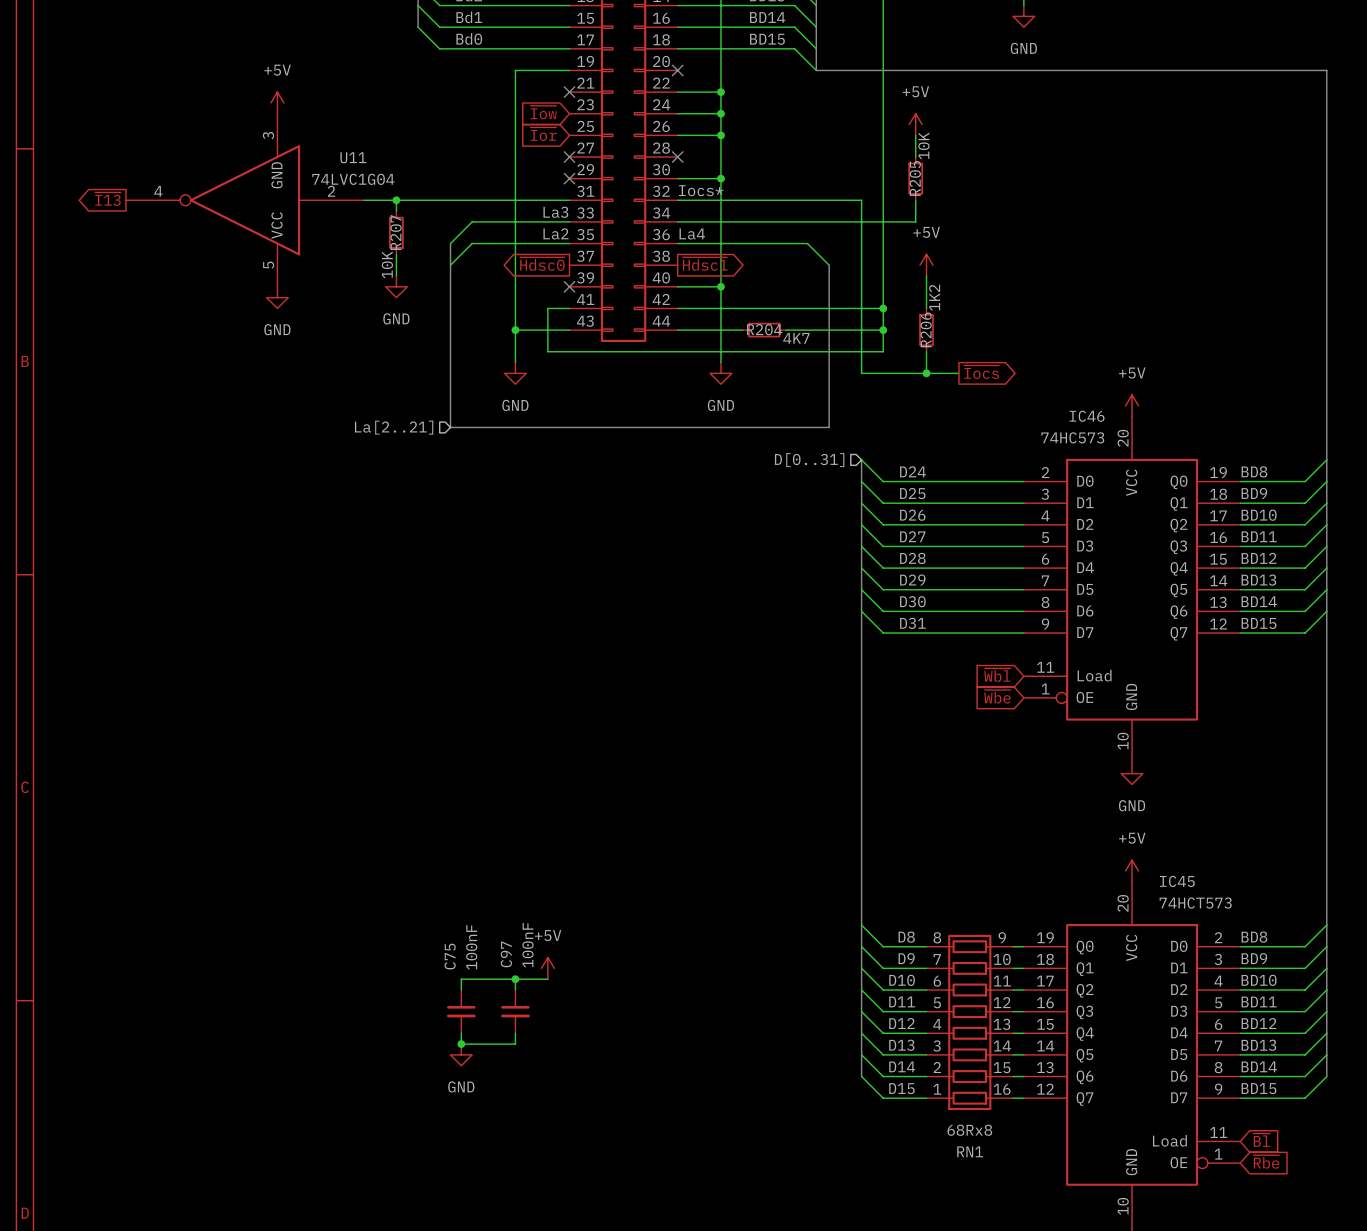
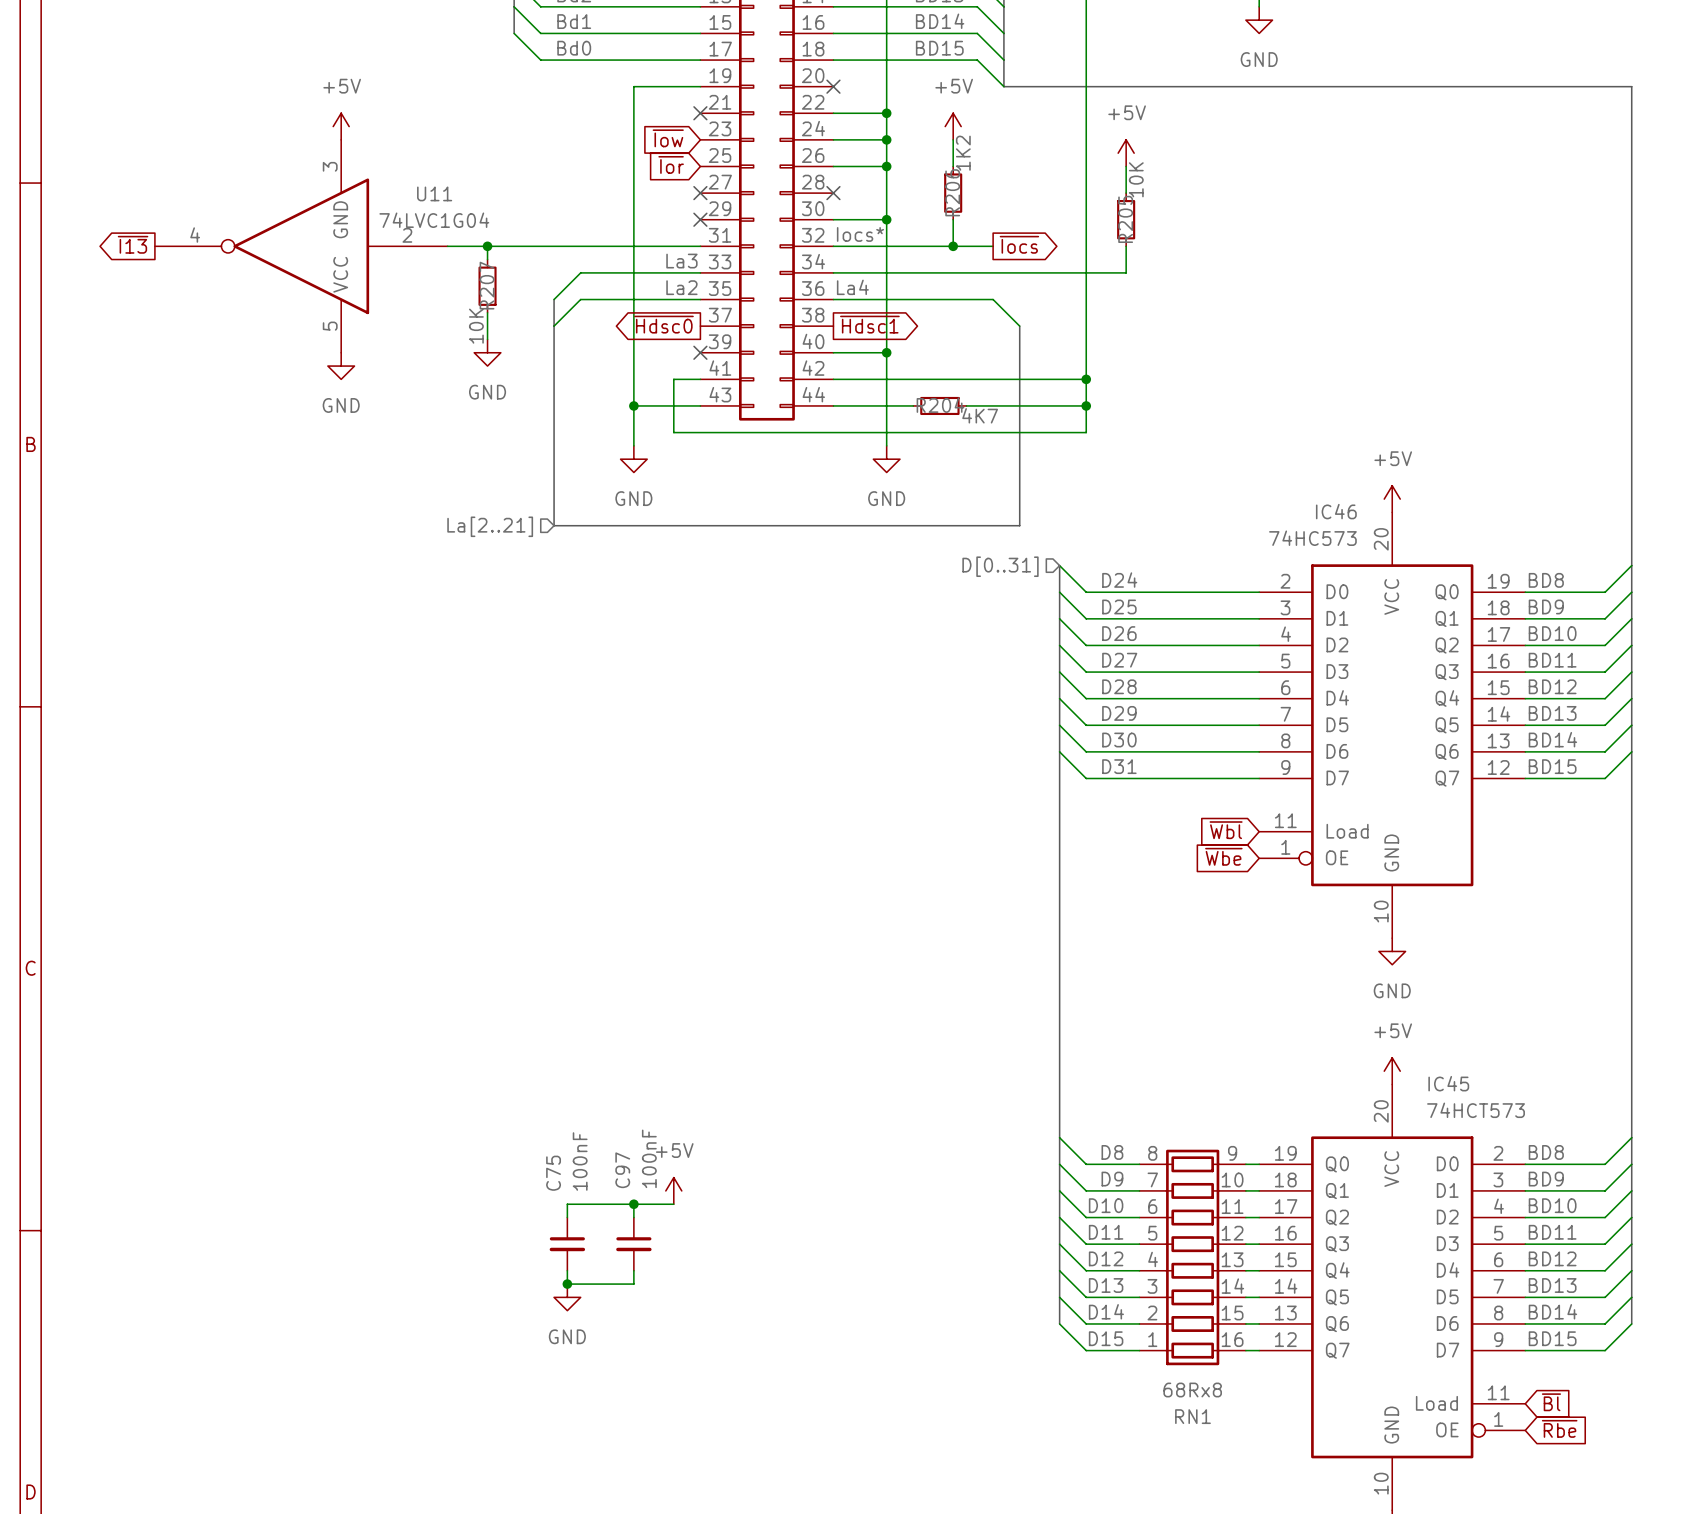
power symbol: none -> +5V (953, 126)
wire: none -> (953, 139) (953, 166)
wire: none -> (953, 219) (953, 246)
global label: none -> ~{Iocs} (1019, 244)
junction: none -> (953, 246)
wire: (807, 200) (861, 200) (861, 373) (958, 373) -> none
power symbol: +5V (926, 265) -> none
wire: (926, 276) (926, 308) -> none
R206 position: (926, 330) -> (953, 193)
wire: (926, 351) (926, 373) -> none
global label: ~{Iocs} (981, 372) -> none
junction: (926, 373) -> none

